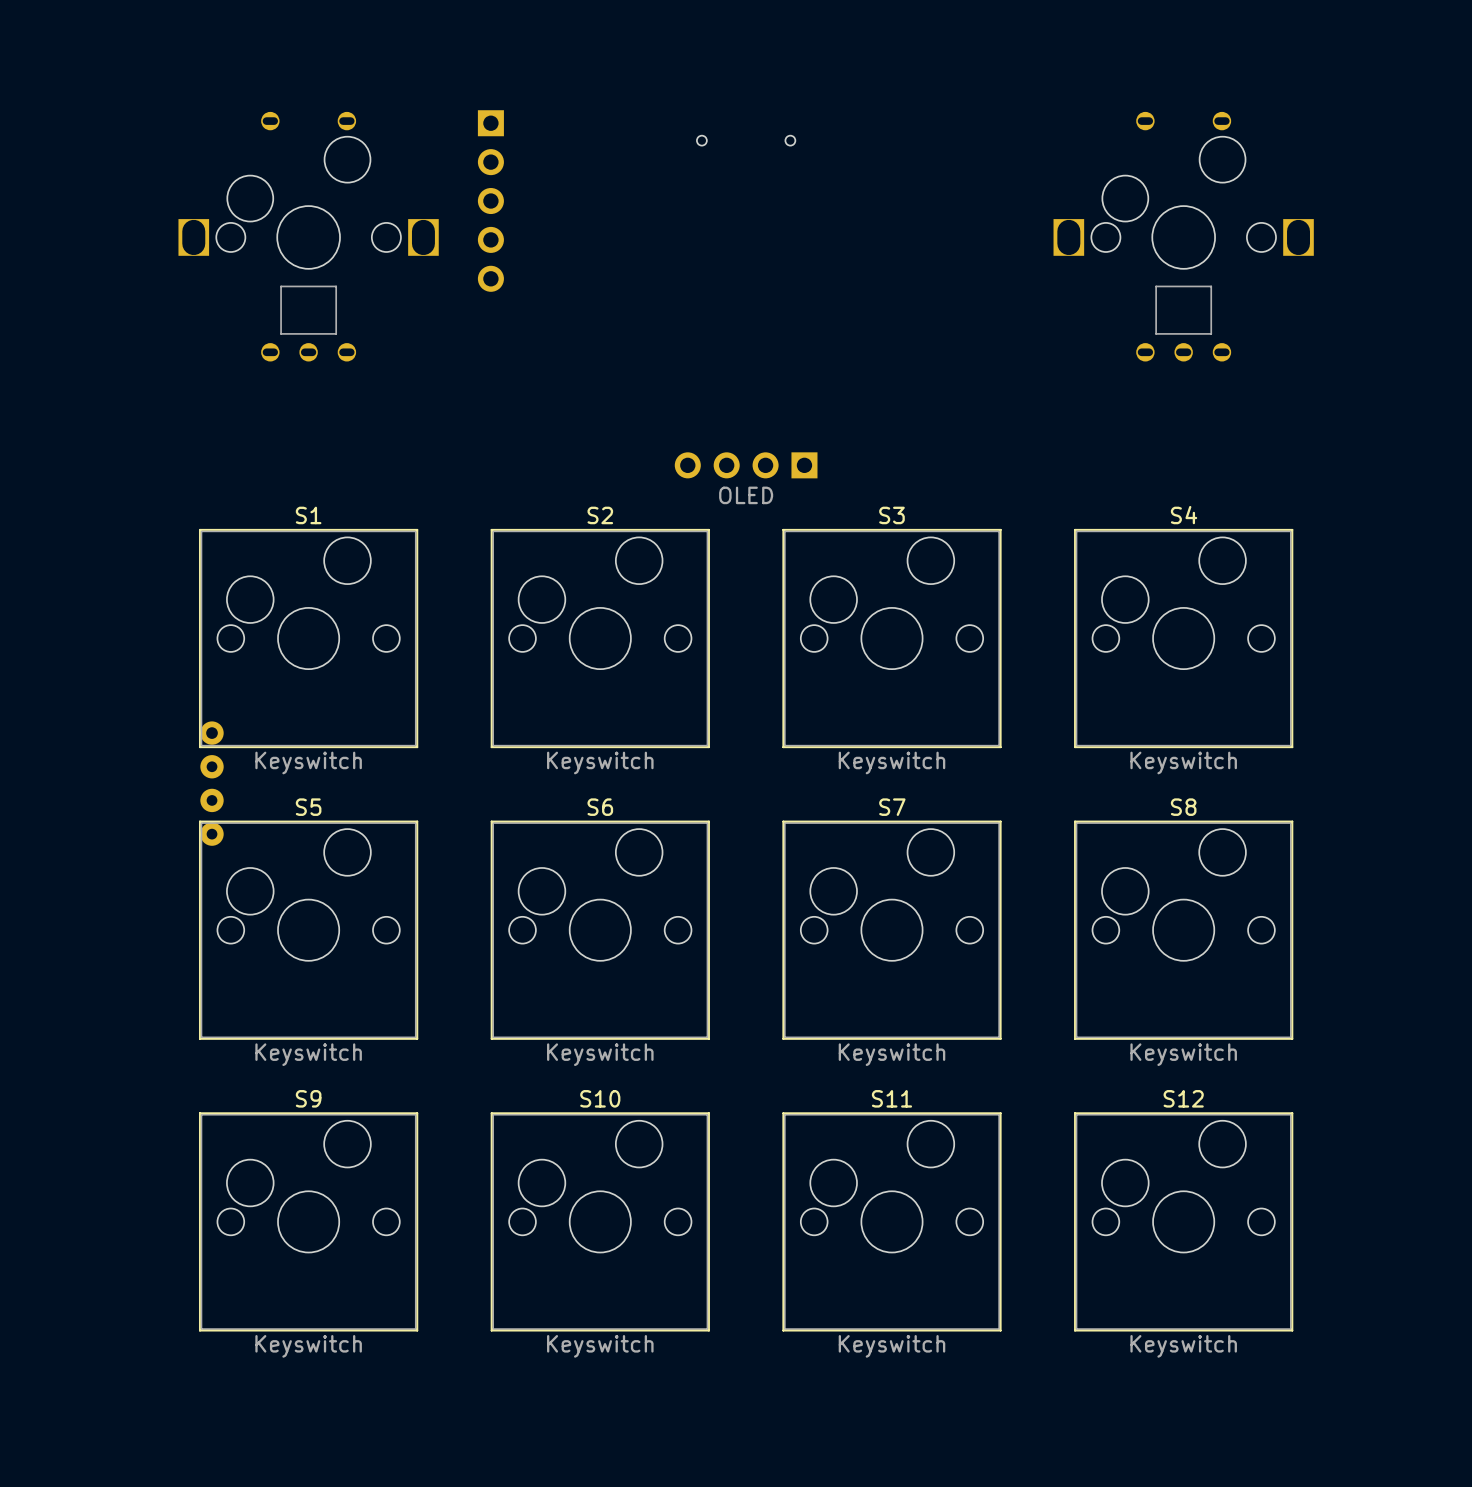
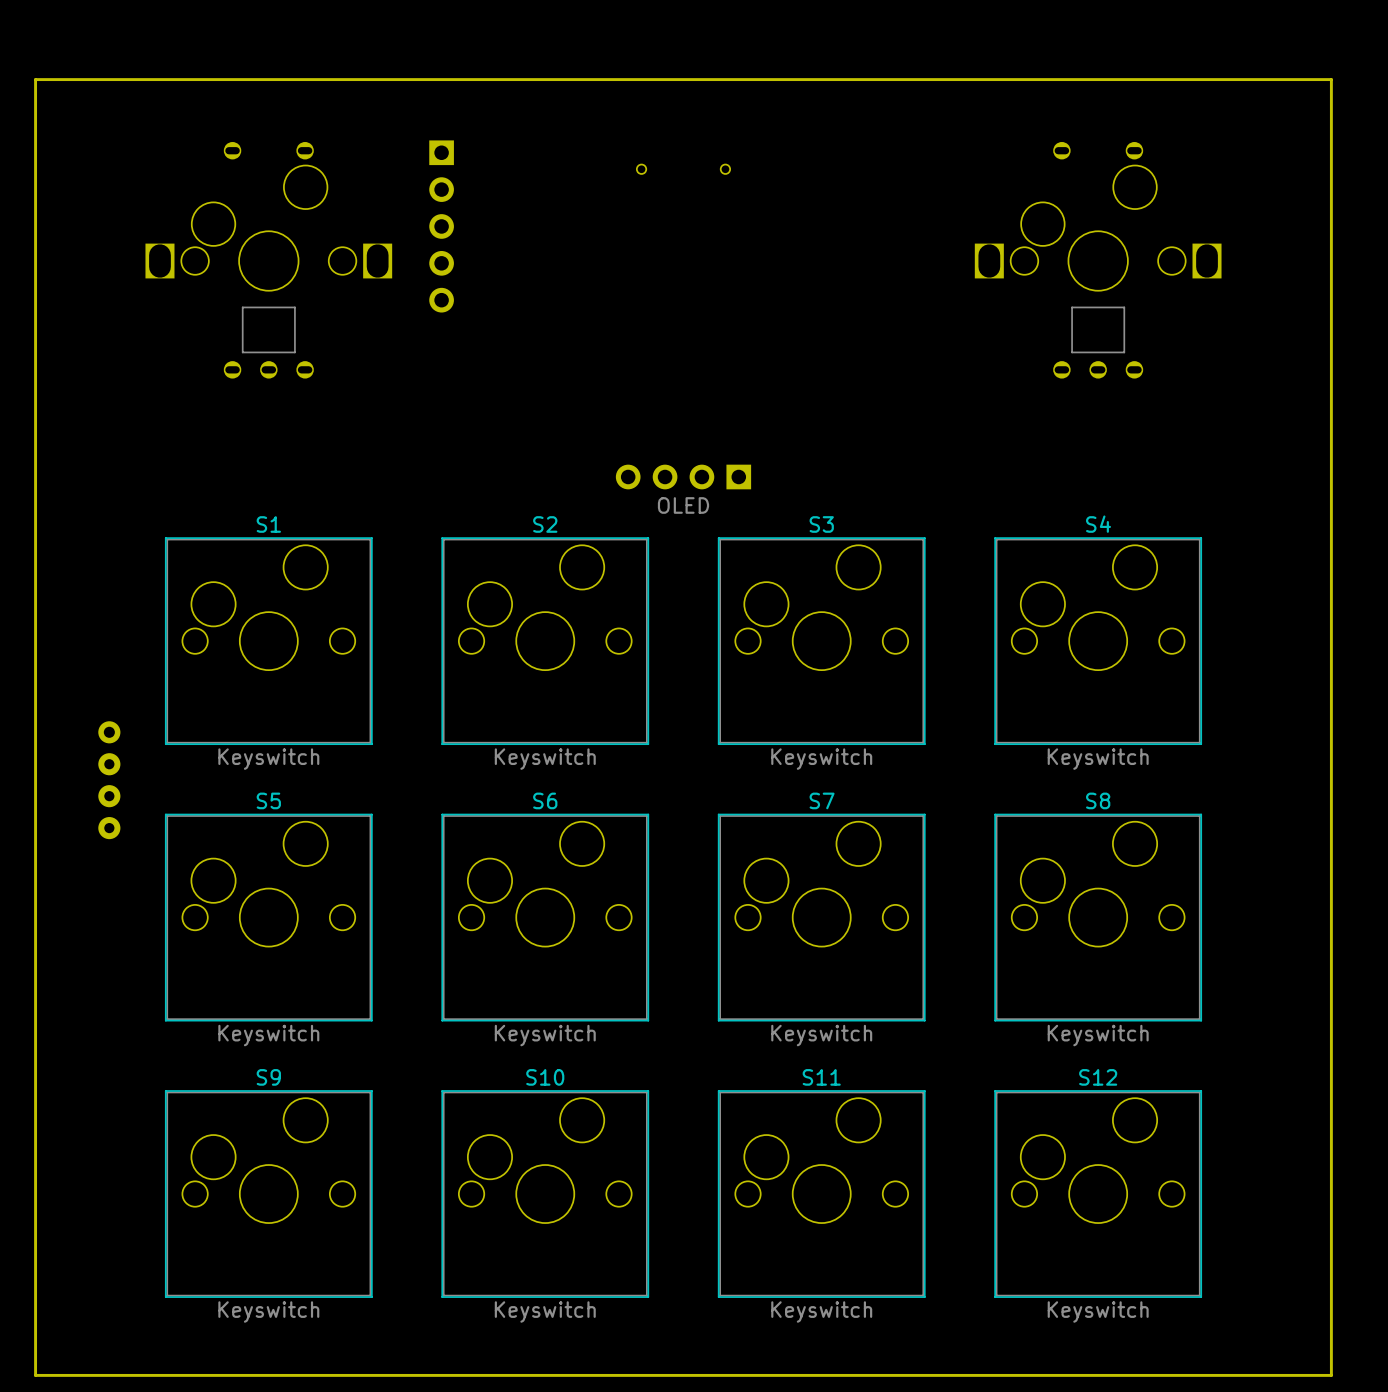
board edge: none -> (35, 79) (1331, 79) (1331, 1375) (35, 1375) (35, 79)
part position: (212, 783) -> (109, 780)

